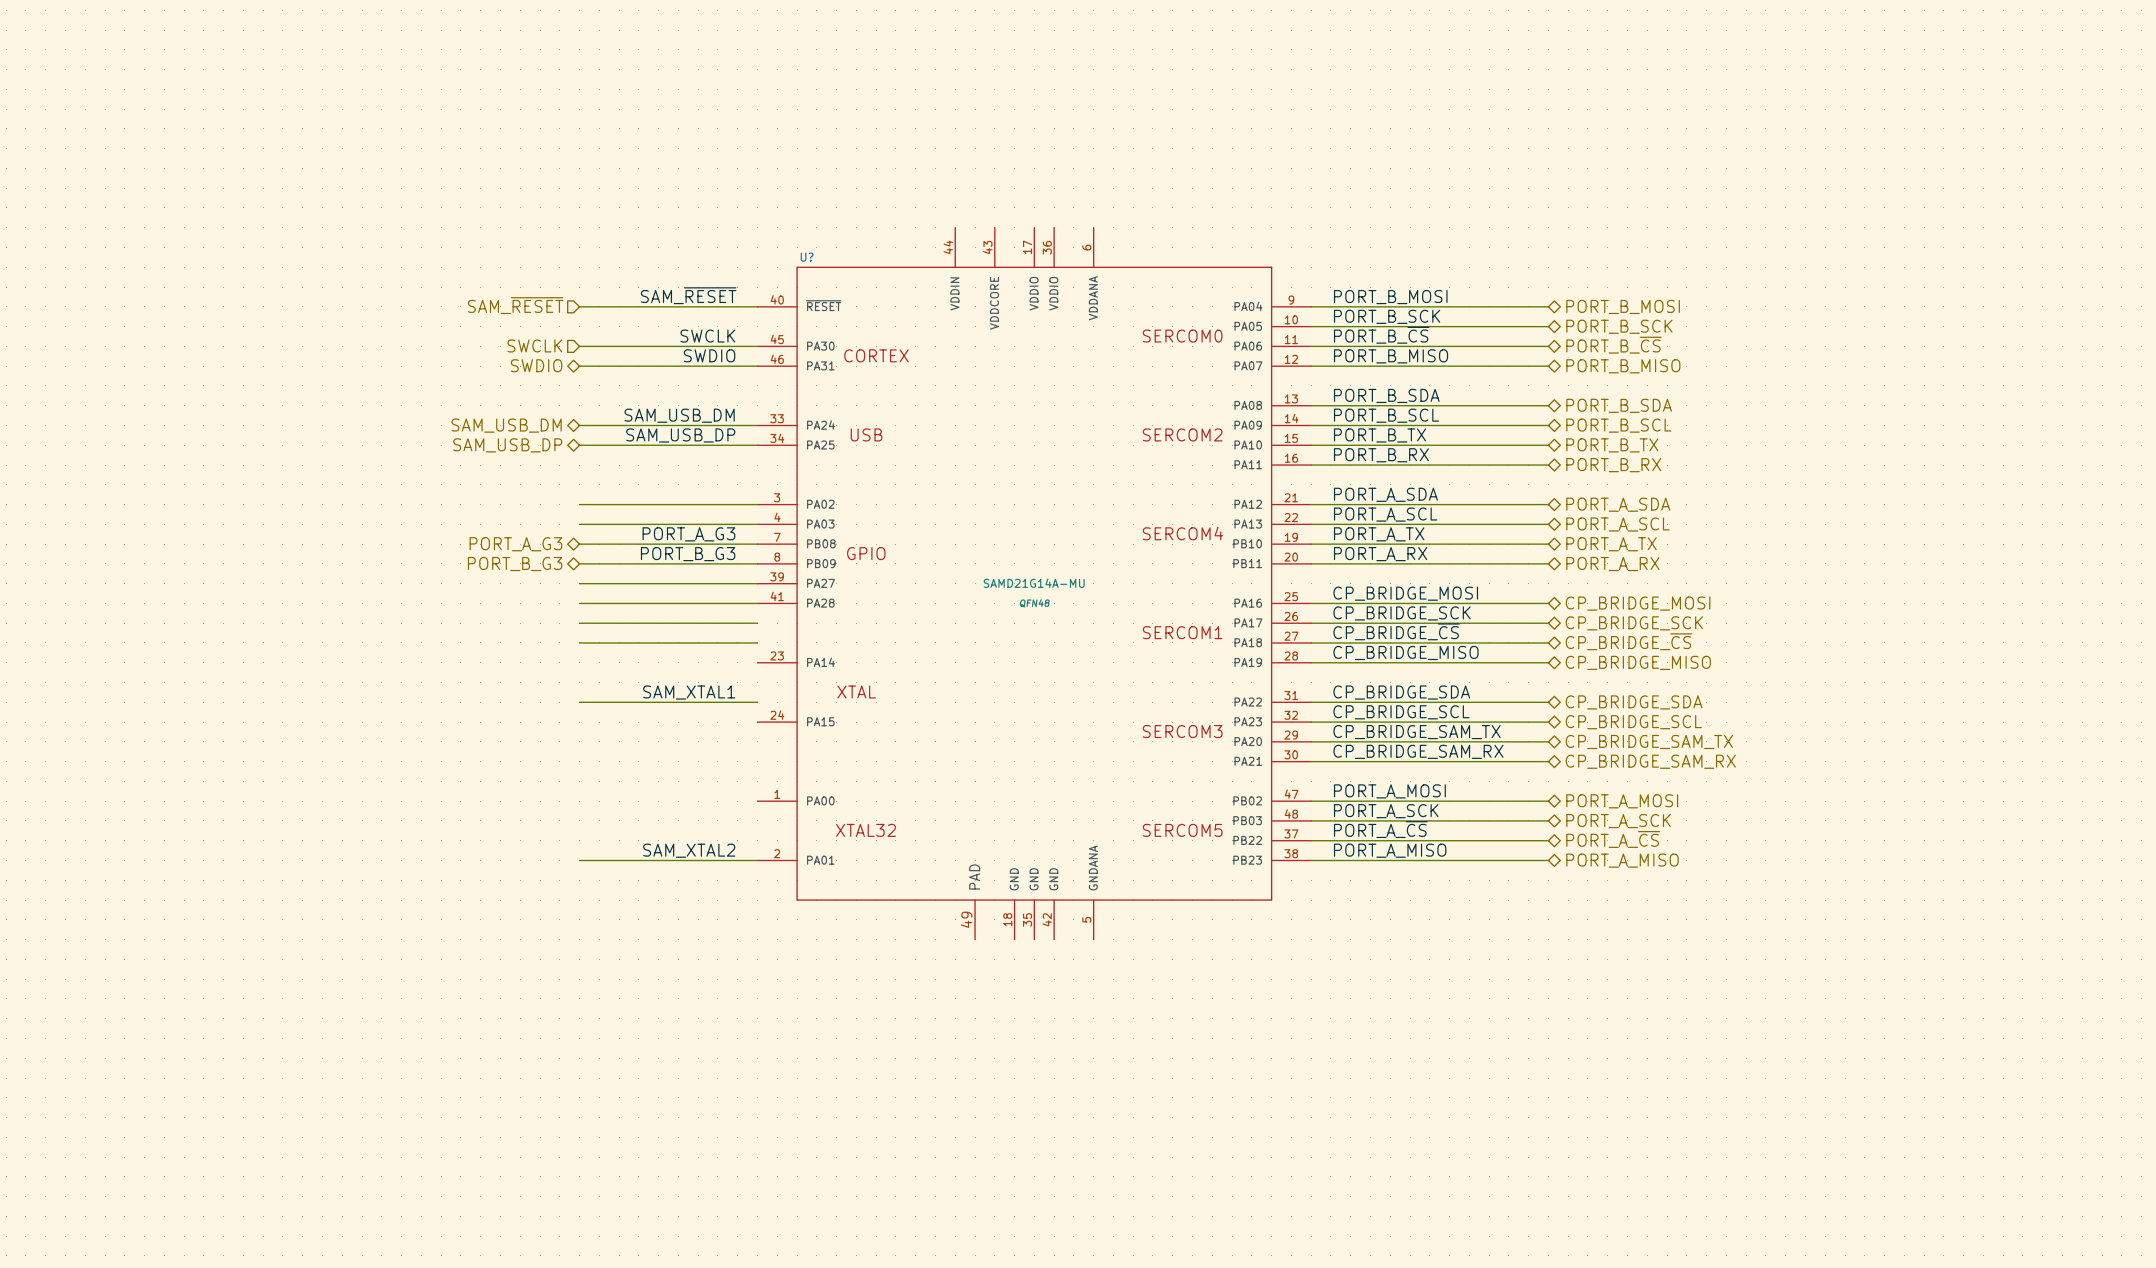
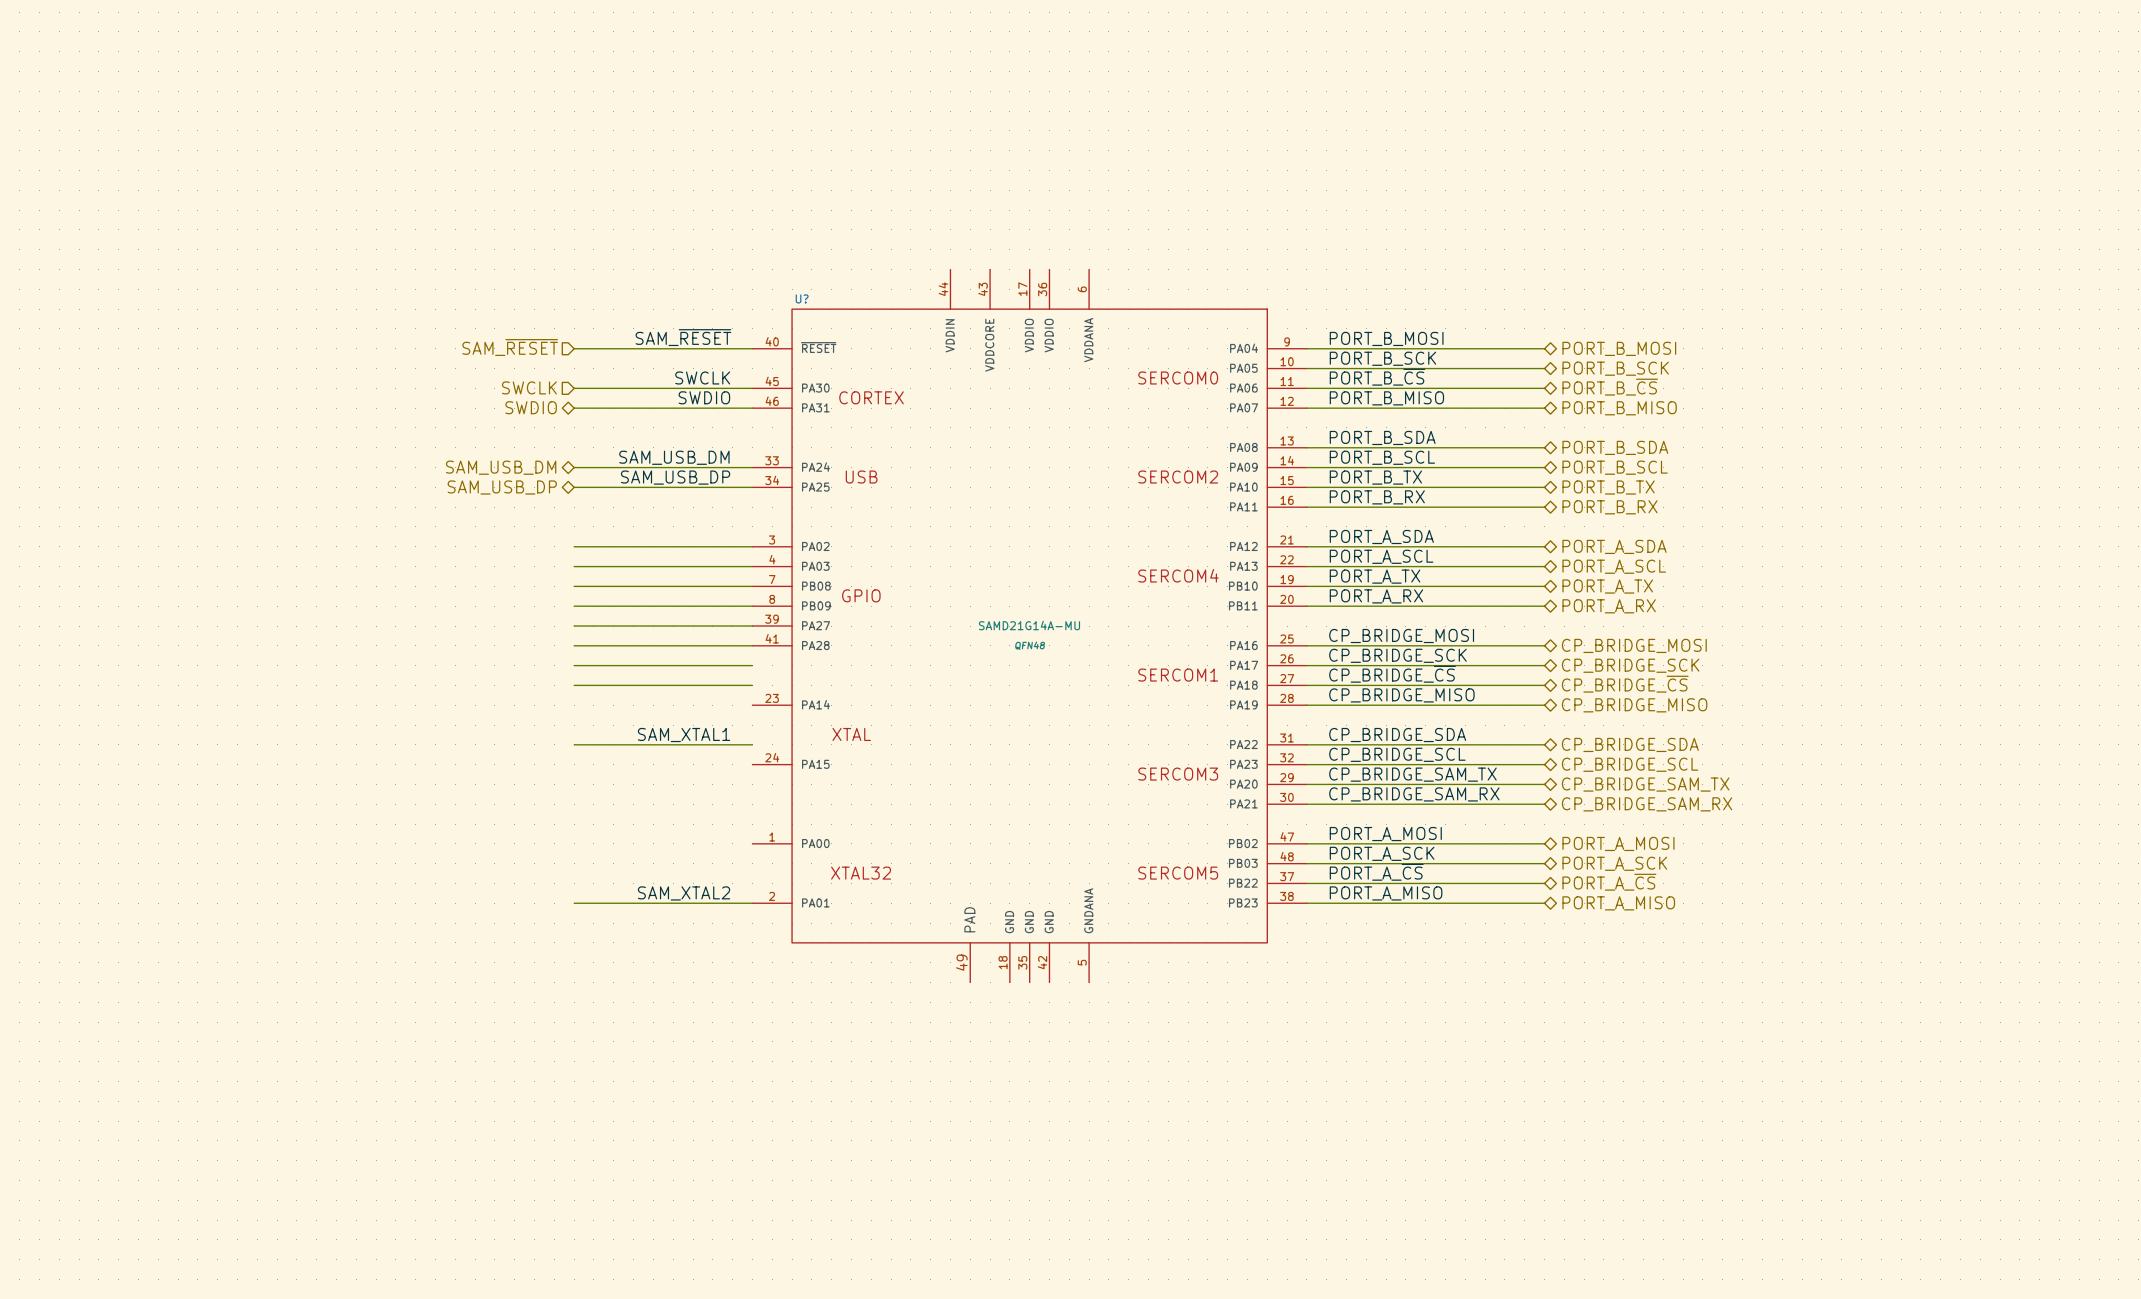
label: PORT_A_G3 (688, 534) -> none
hierarchical label: PORT_A_G3 (515, 544) -> none
label: PORT_B_G3 (688, 554) -> none
hierarchical label: PORT_B_G3 (515, 564) -> none

